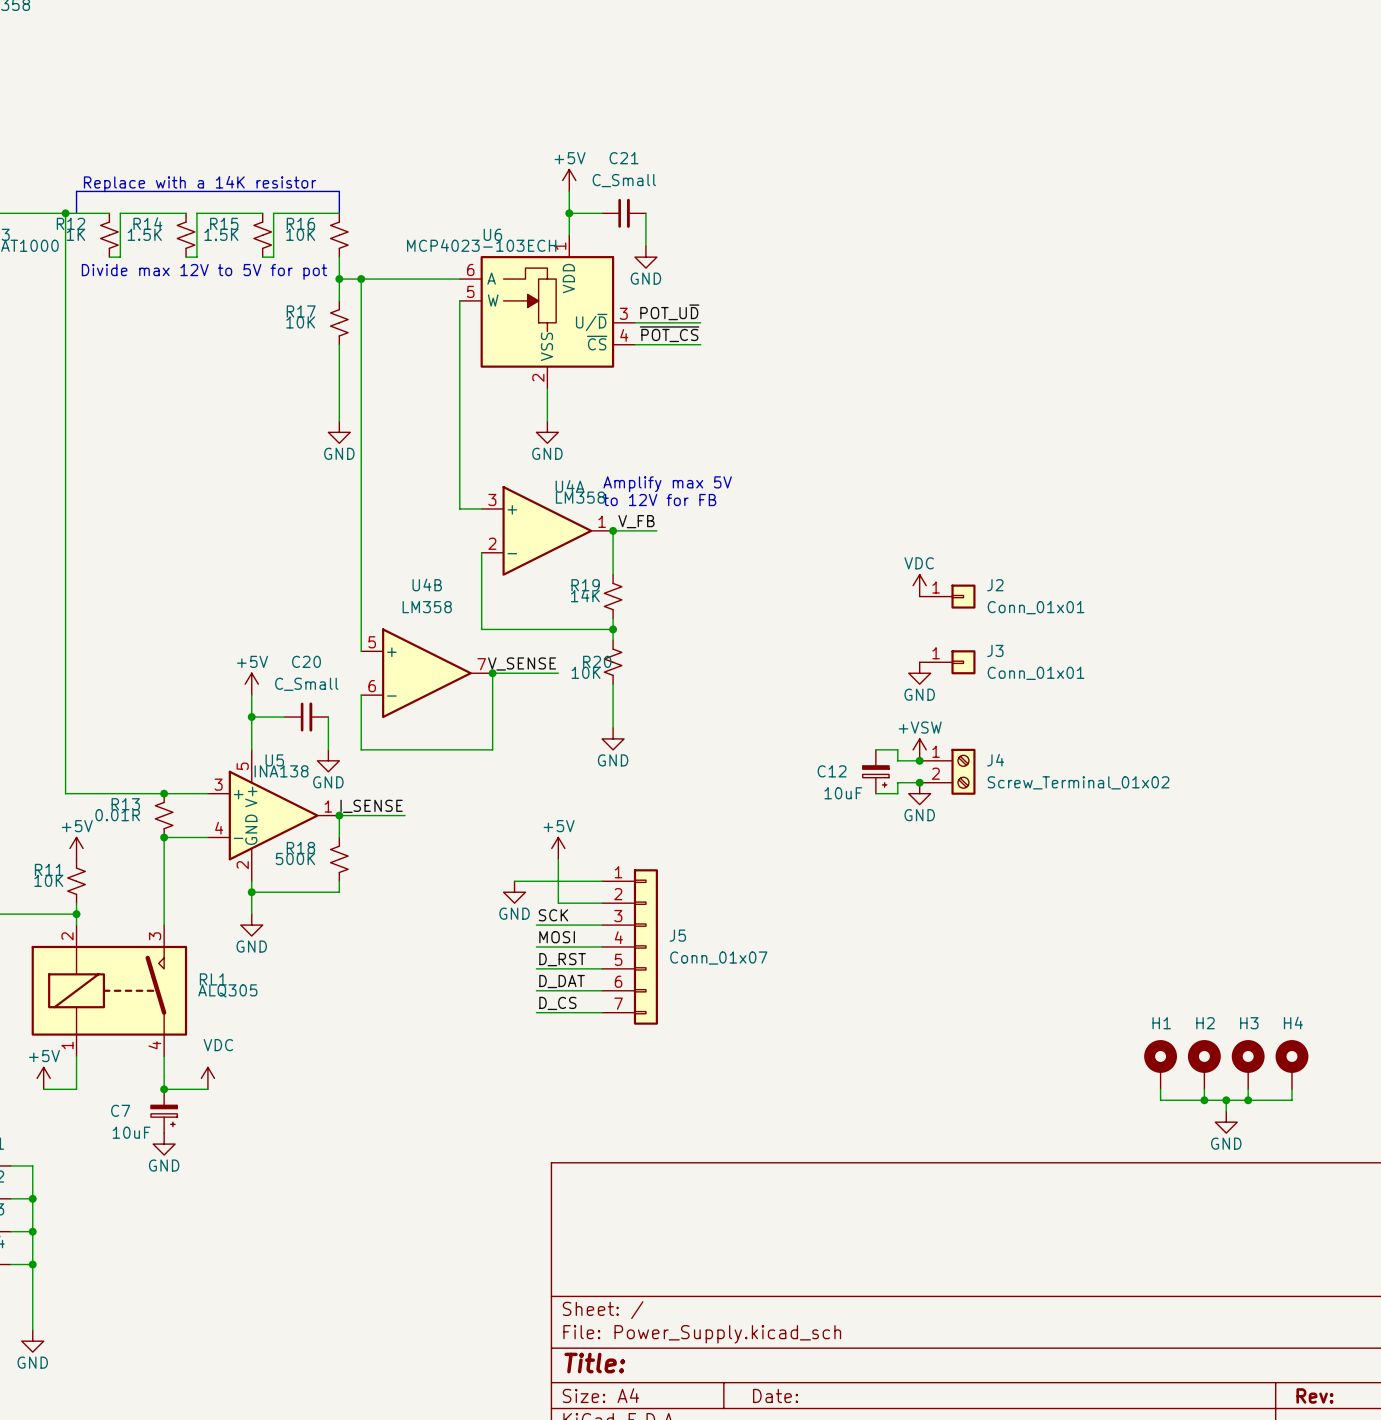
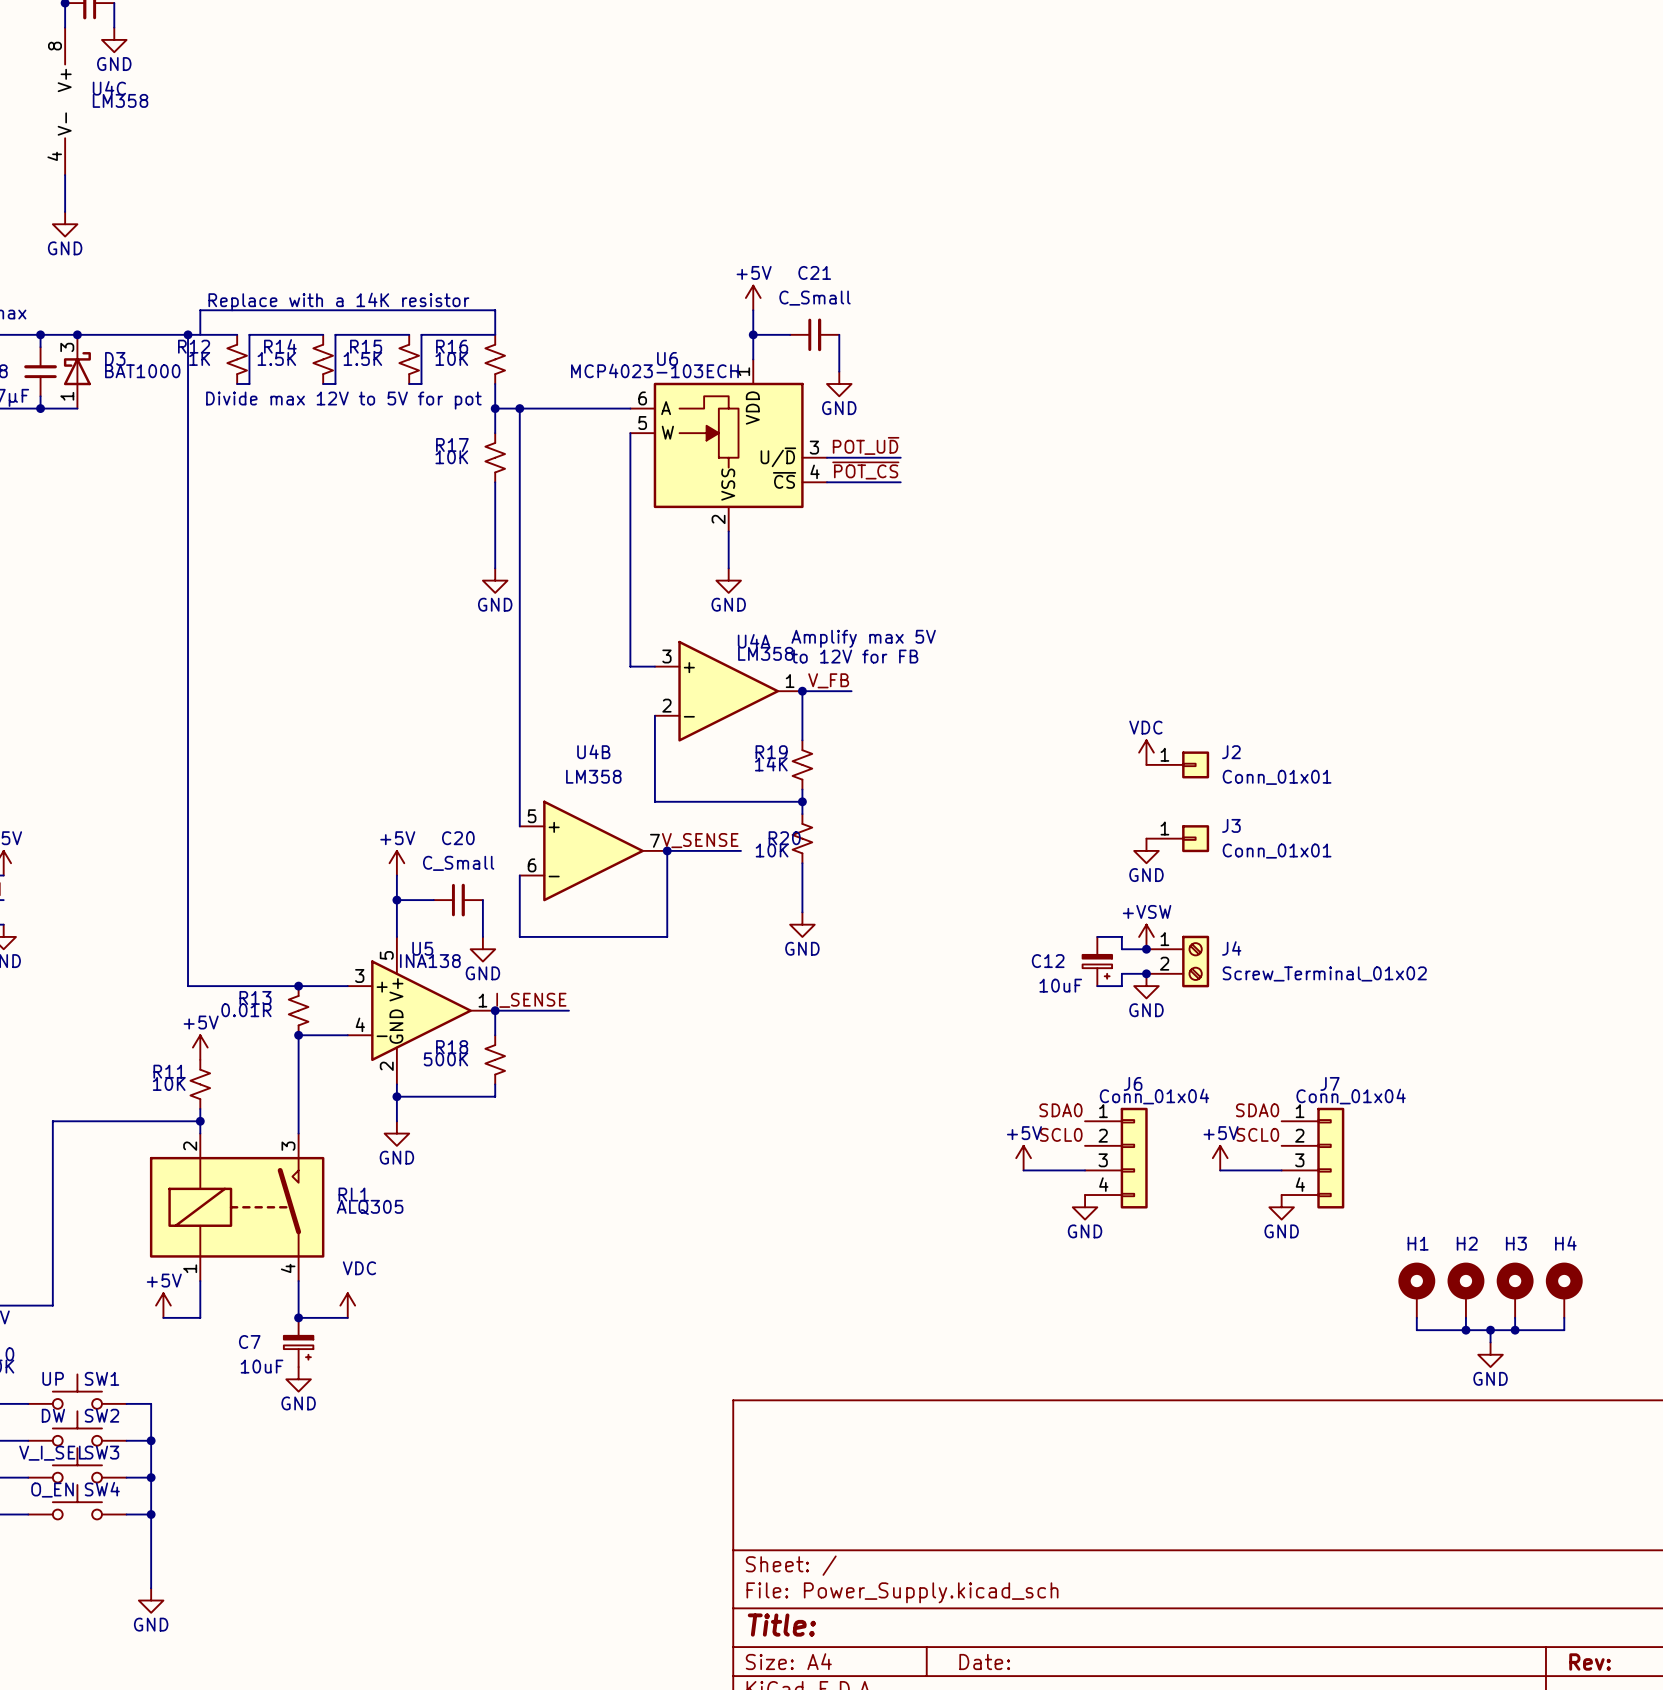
power symbol: +5V (558, 848) -> none
wire: (558, 859) (558, 903) (602, 903) -> none
wire: (514, 881) (602, 881) -> none
power symbol: GND (514, 892) -> none
label: none -> SDA0 (1060, 1110)
label: none -> SDA0 (1257, 1110)
label: SCK (553, 915) -> none
wire: (536, 925) (602, 925) -> none
label: none -> SCL0 (1061, 1134)
label: none -> SCL0 (1257, 1134)
label: MOSI (557, 937) -> none
wire: (536, 946) (602, 946) -> none
J5: Conn_01x07 (630, 946) -> none
power symbol: none -> +5V (1023, 1158)
J6: none -> Conn_01x04 (1116, 1158)
power symbol: none -> +5V (1220, 1158)
J7: none -> Conn_01x04 (1312, 1158)
wire: none -> (1023, 1170) (1085, 1170)
wire: none -> (1220, 1170) (1281, 1170)
label: D_RST (562, 959) -> none
wire: (536, 968) (602, 968) -> none
label: D_DAT (562, 981) -> none
wire: (536, 990) (602, 990) -> none
power symbol: none -> GND (1085, 1207)
power symbol: none -> GND (1281, 1207)
label: D_CS (557, 1003) -> none
wire: (536, 1012) (602, 1012) -> none

